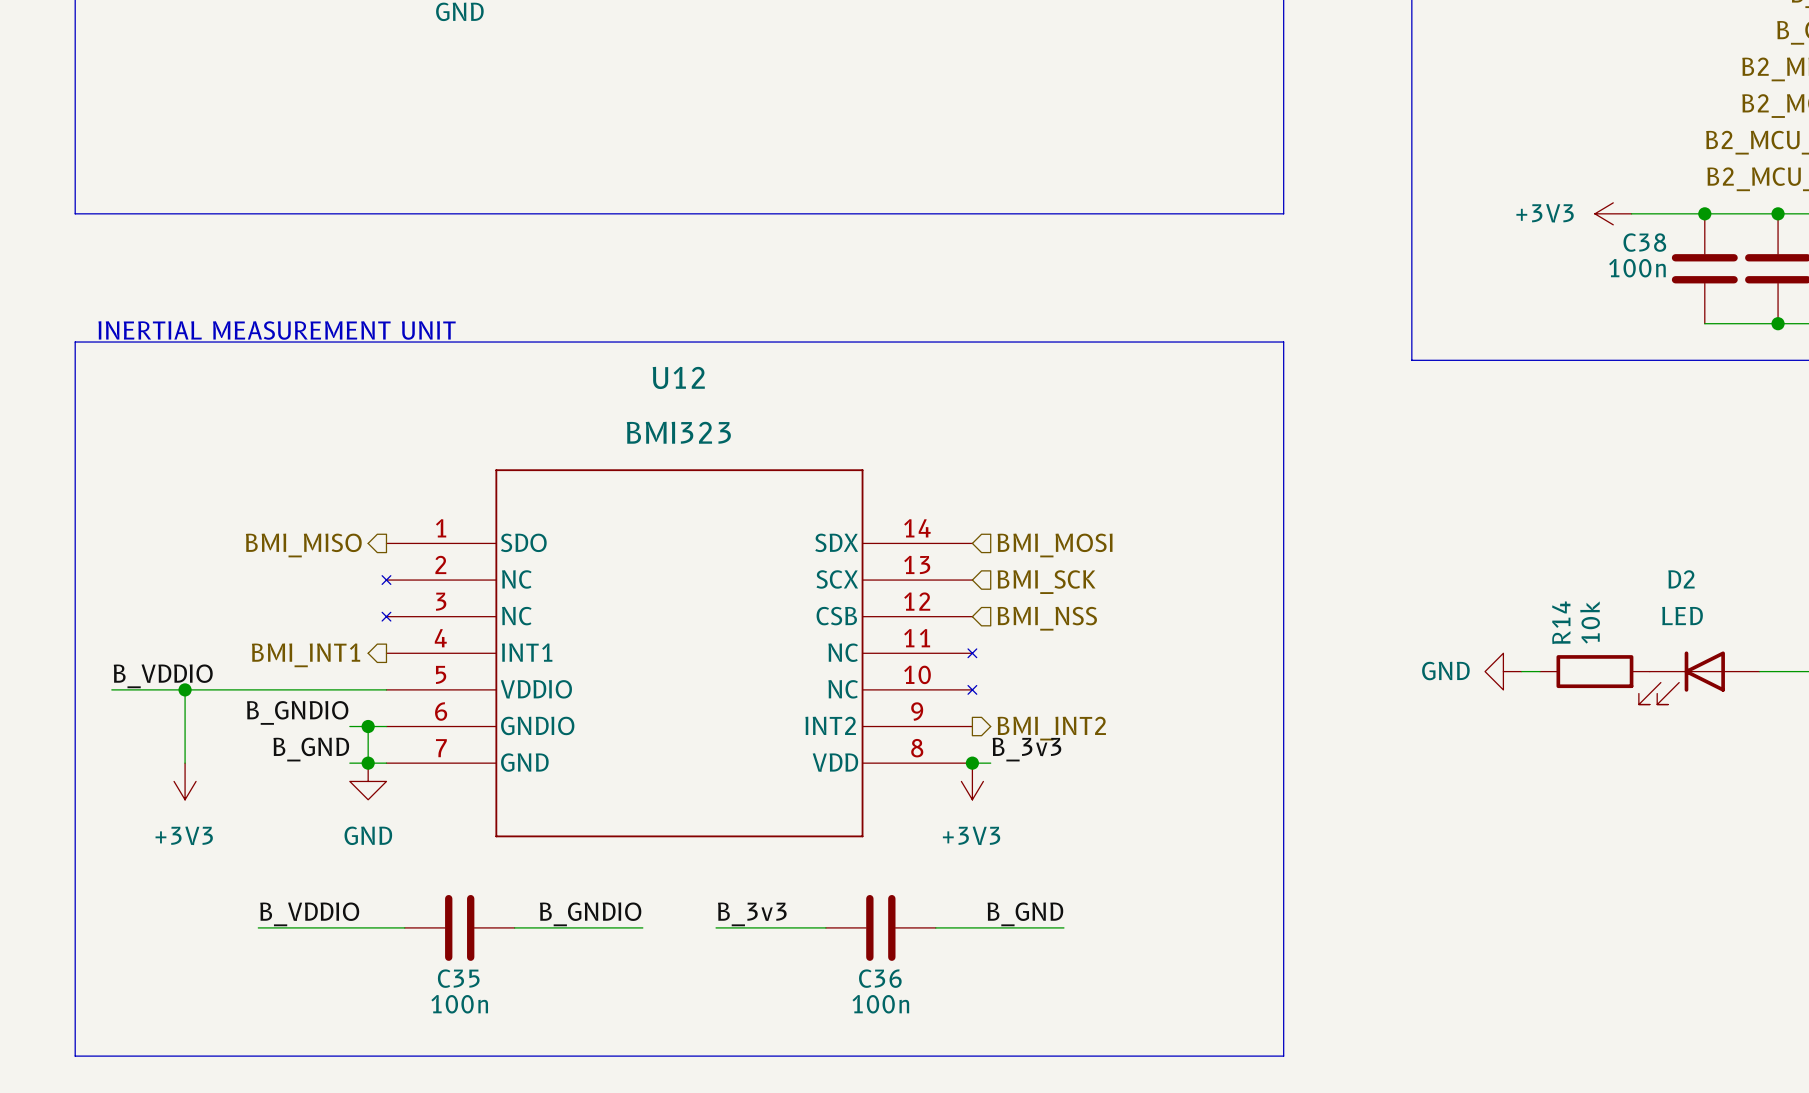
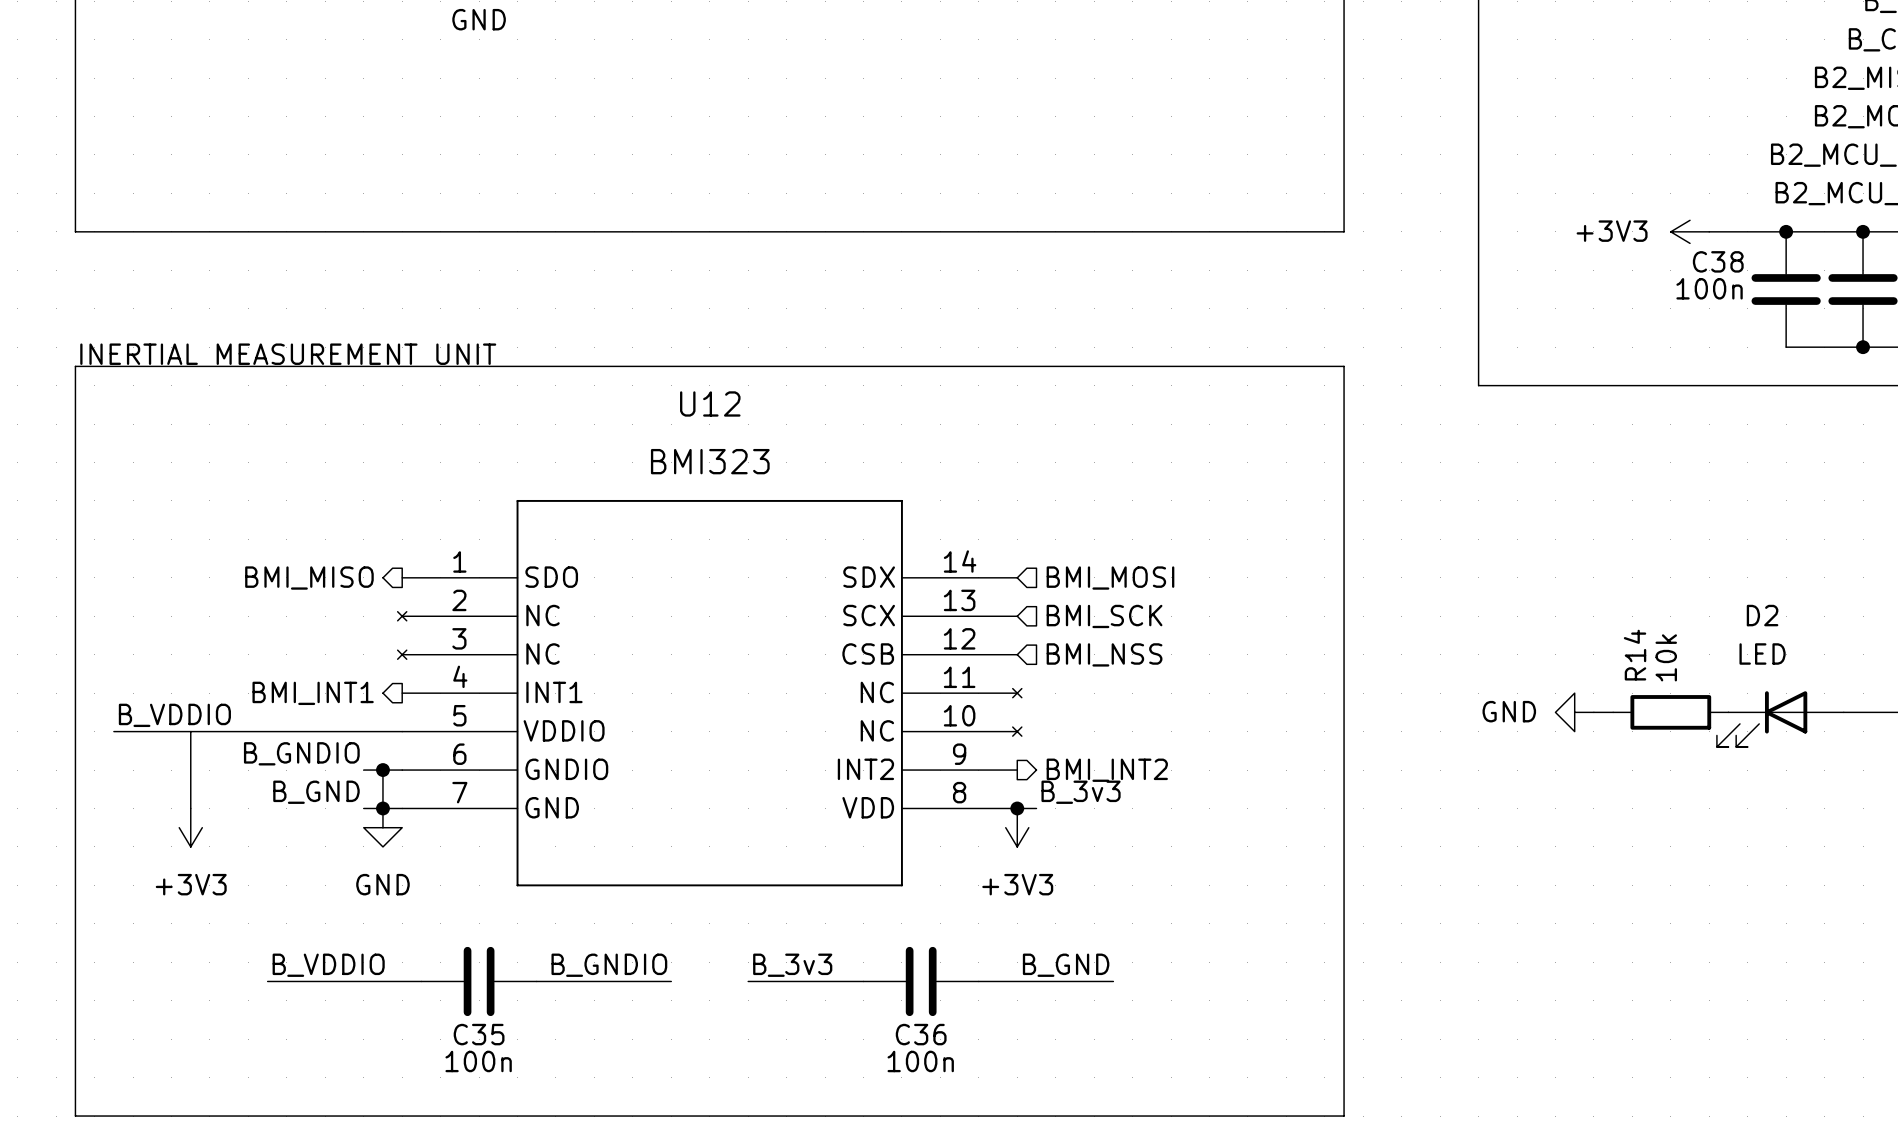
junction: (185, 689) -> none

